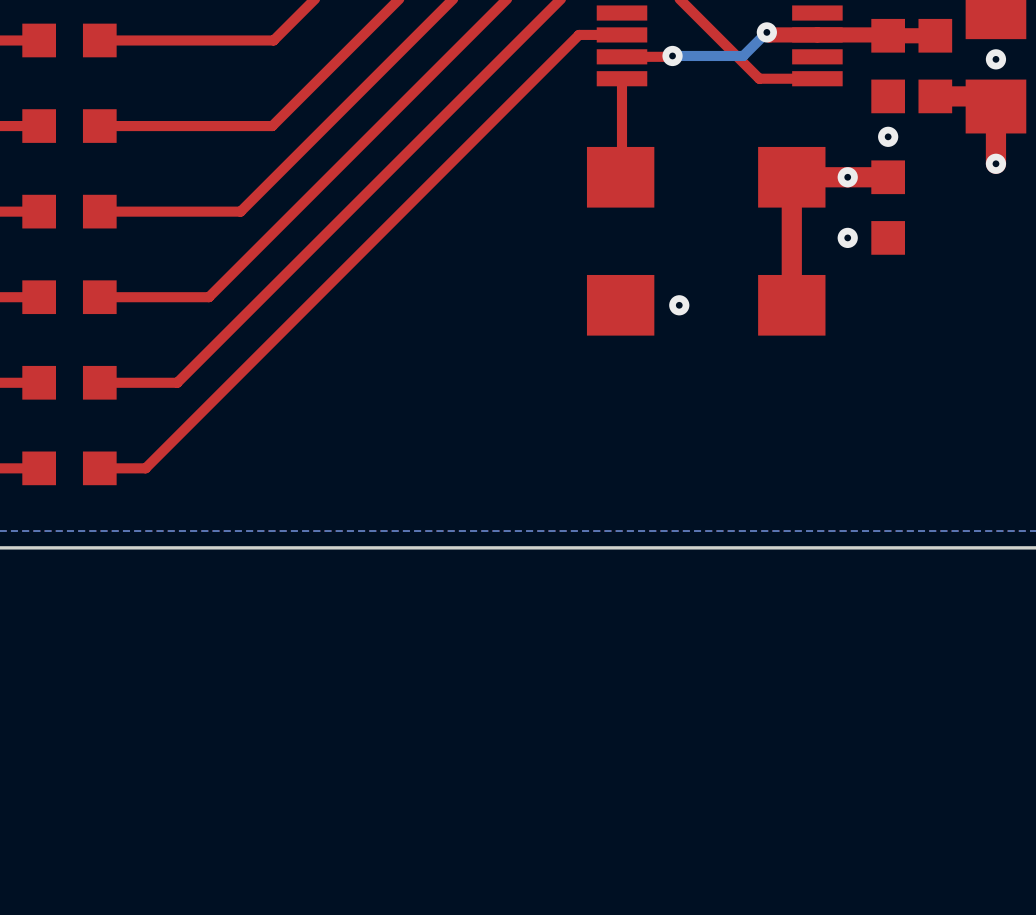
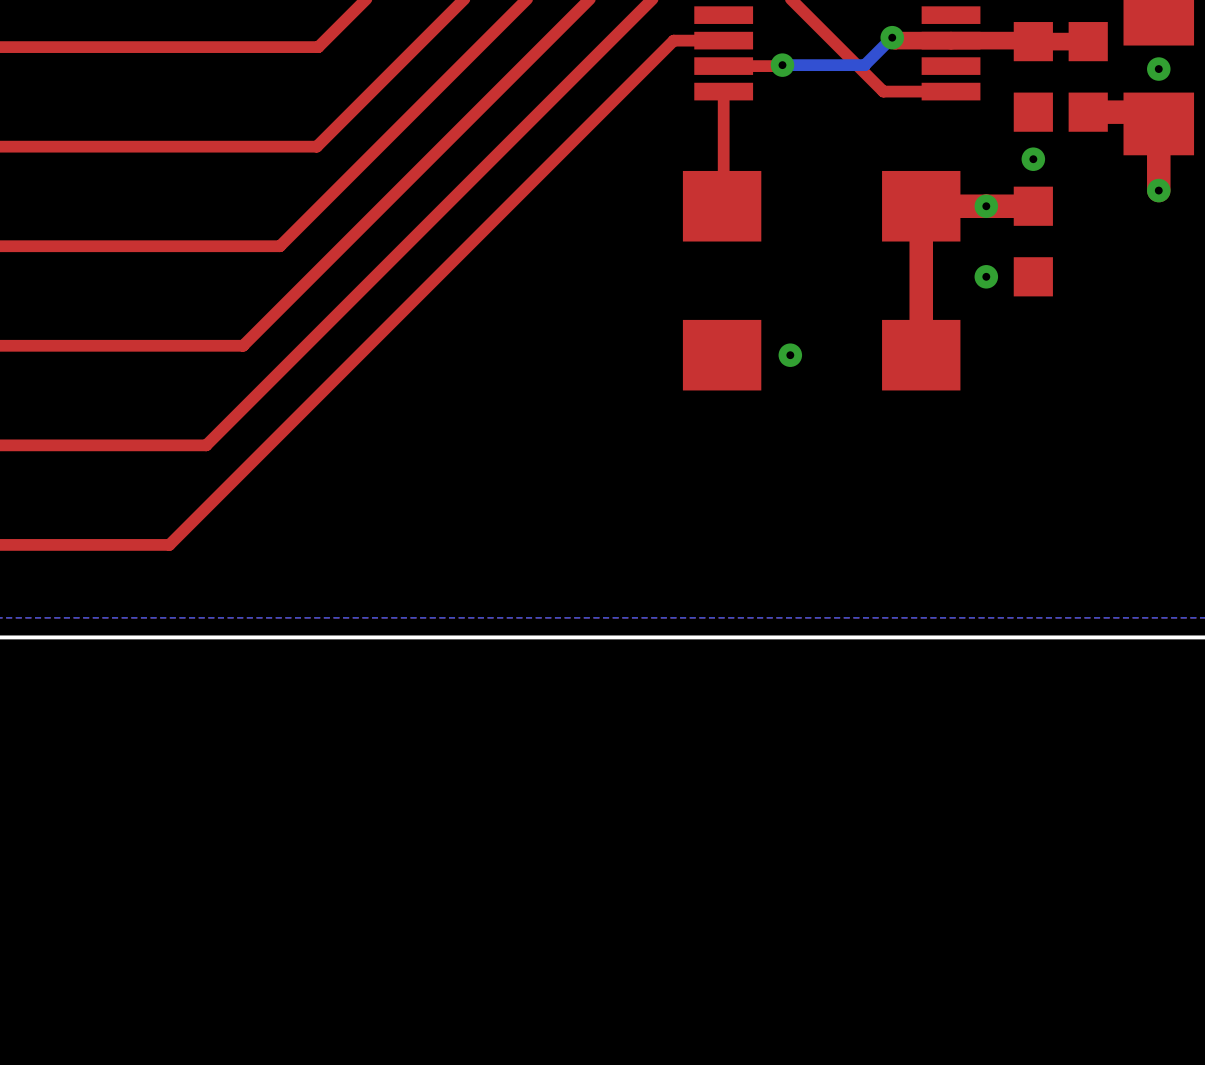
part: (69, 40) -> none
top track: none -> (116, 47) (41, 47)
part: (69, 126) -> none
top track: none -> (116, 146) (41, 146)
part: (69, 211) -> none
top track: none -> (116, 246) (41, 246)
part: (69, 297) -> none
top track: none -> (116, 345) (41, 345)
part: (69, 382) -> none
top track: none -> (116, 445) (41, 445)
part: (69, 468) -> none
top track: none -> (116, 544) (41, 544)

